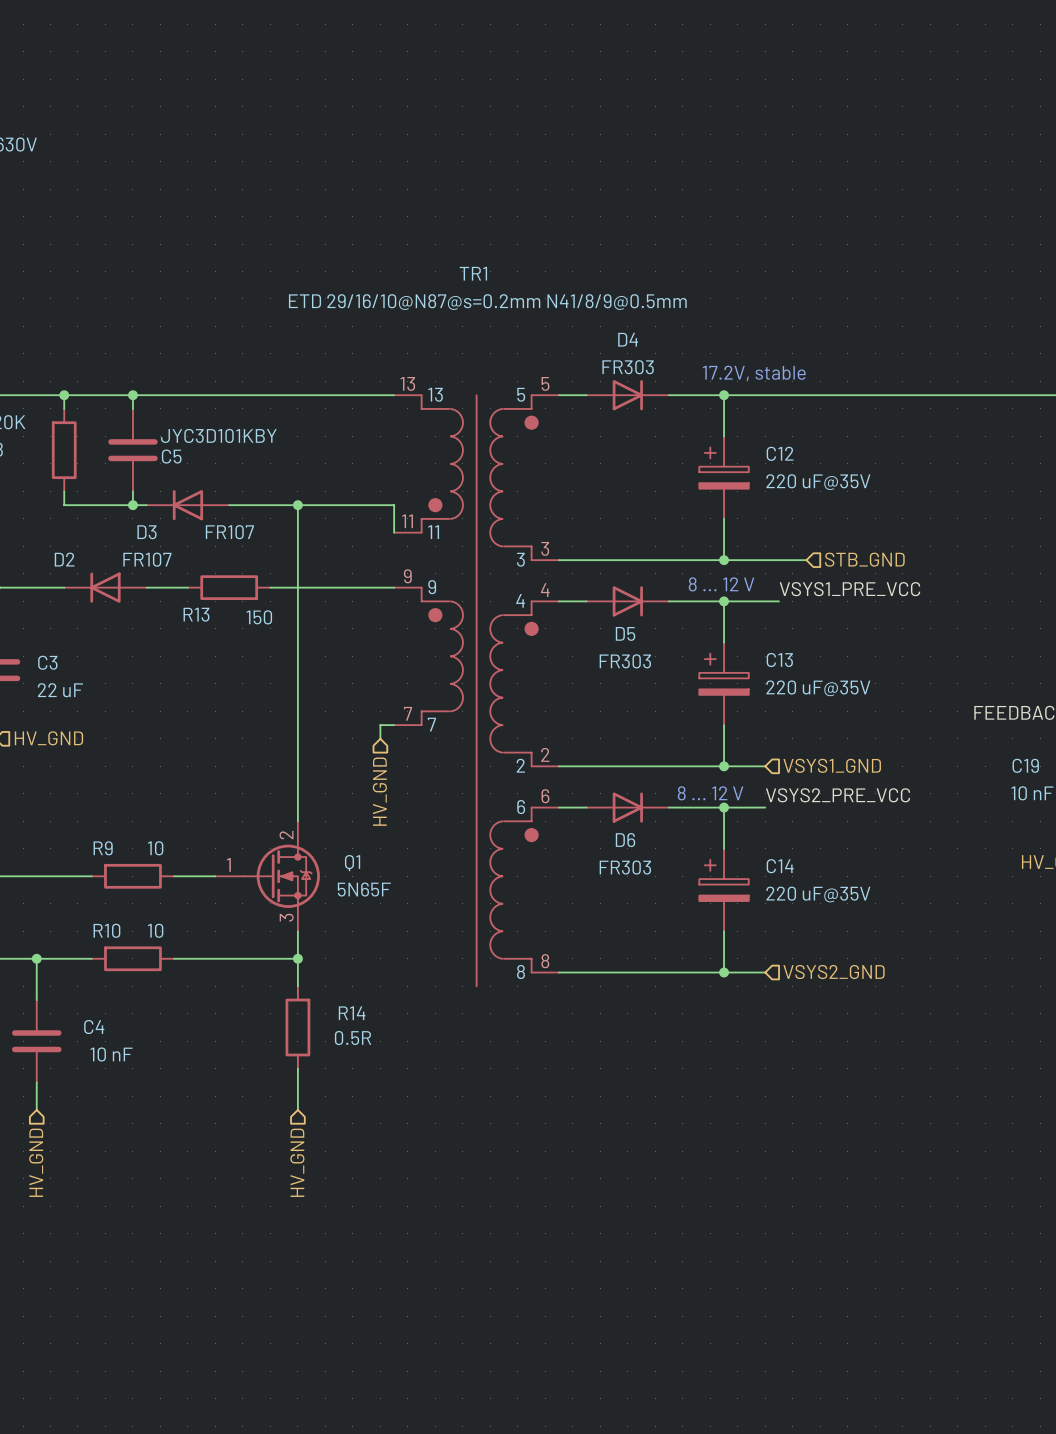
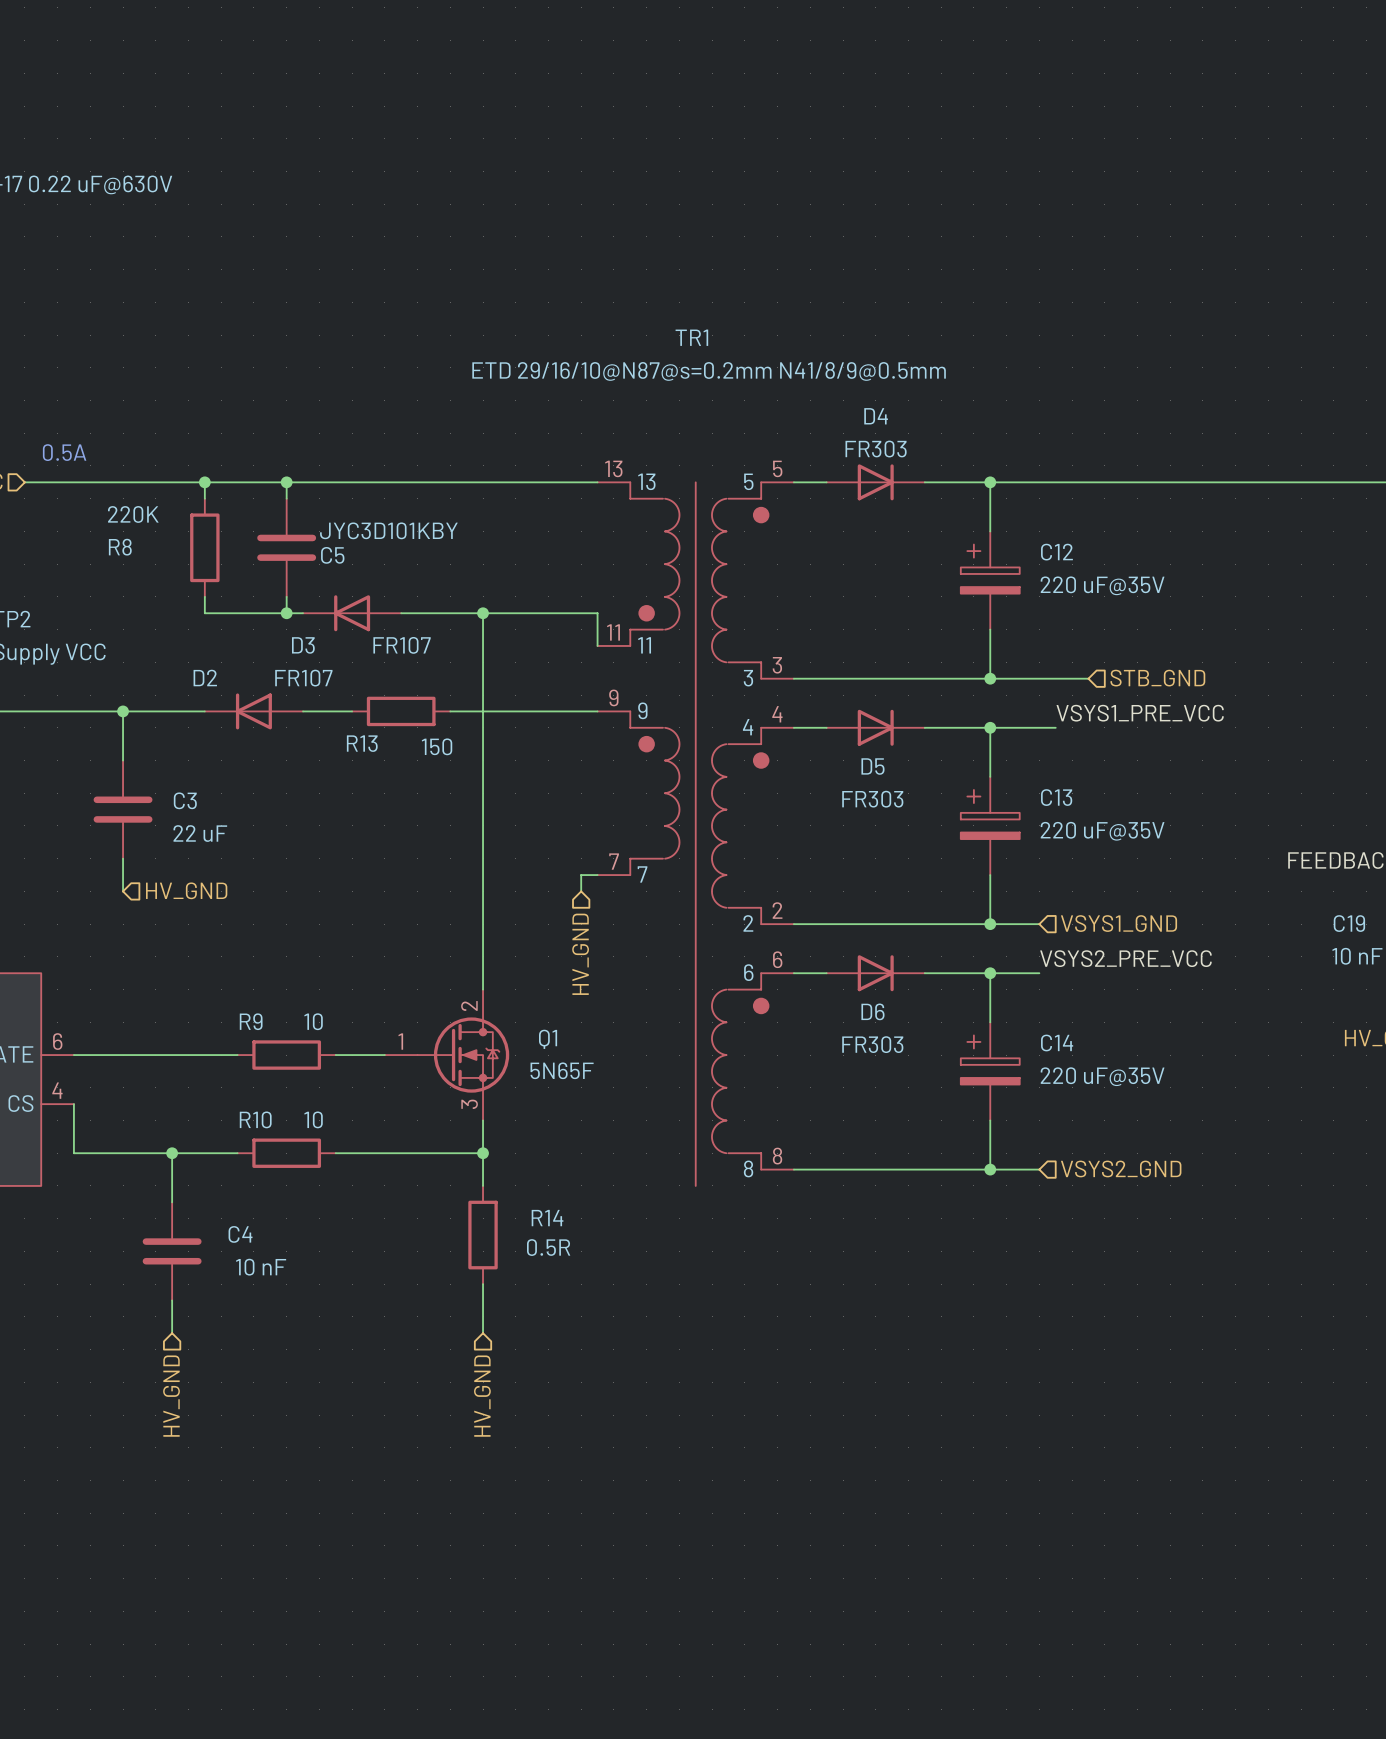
text: 17.2V, stable (754, 373) -> none
text: 8 ... 12 V (721, 584) -> none
text: 8 ... 12 V (710, 793) -> none

